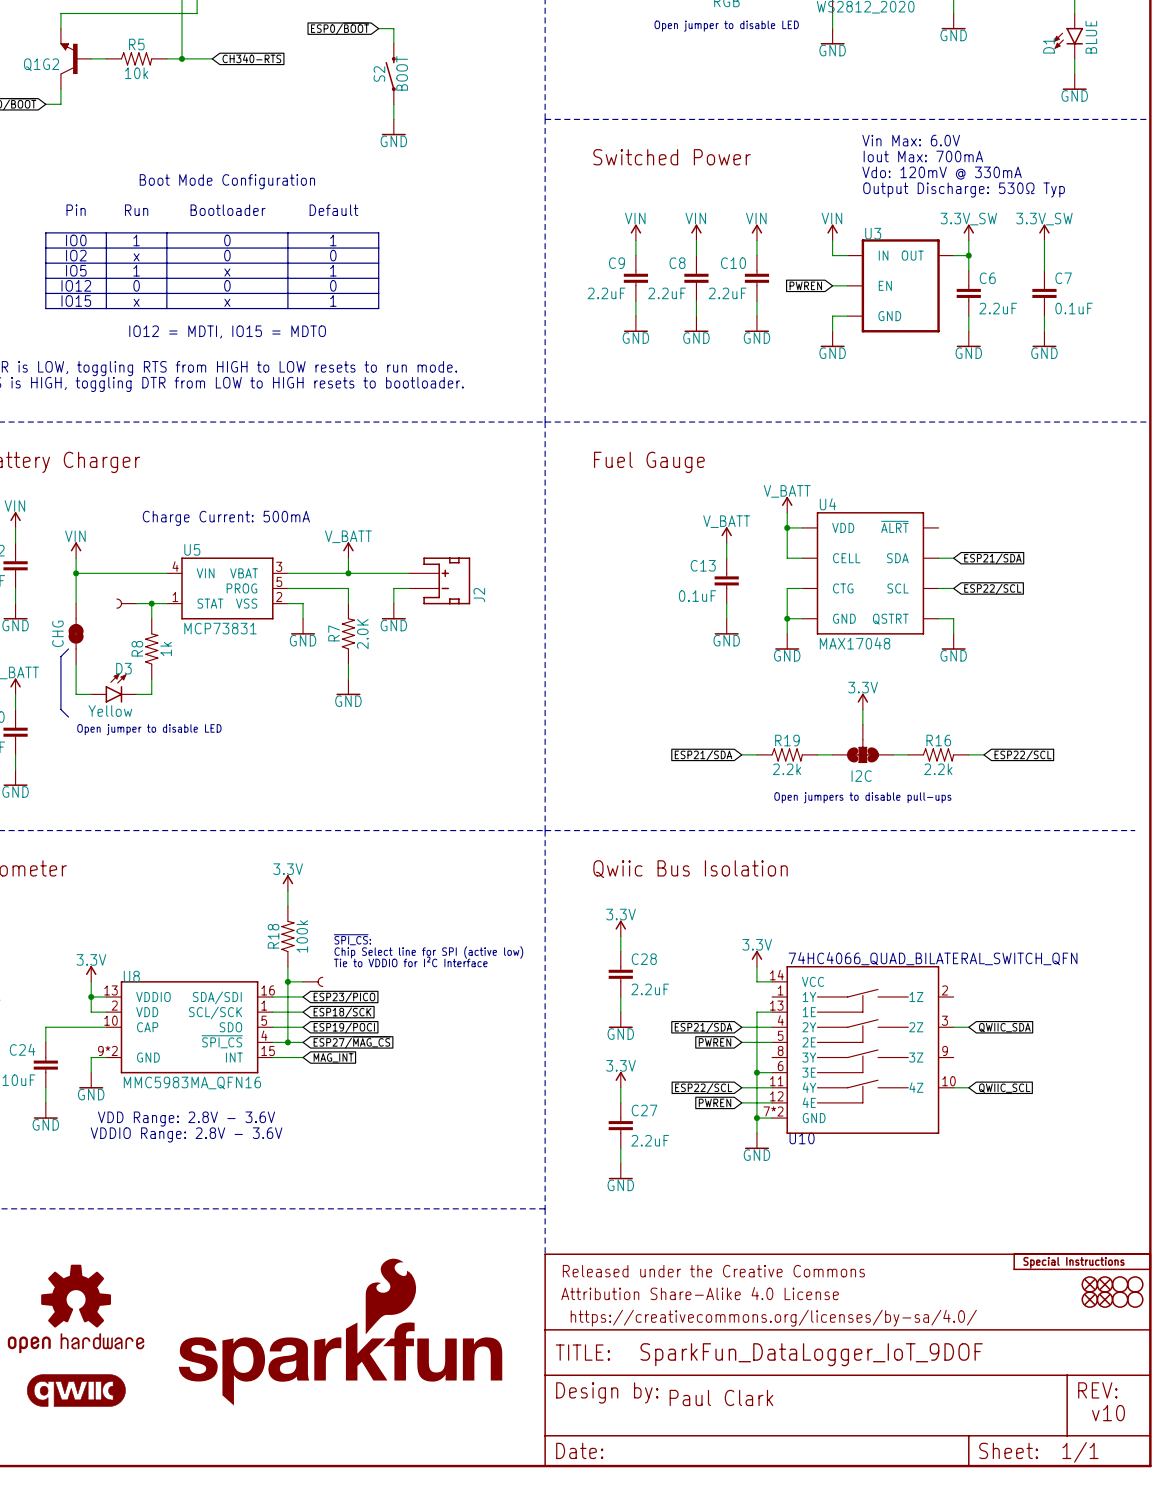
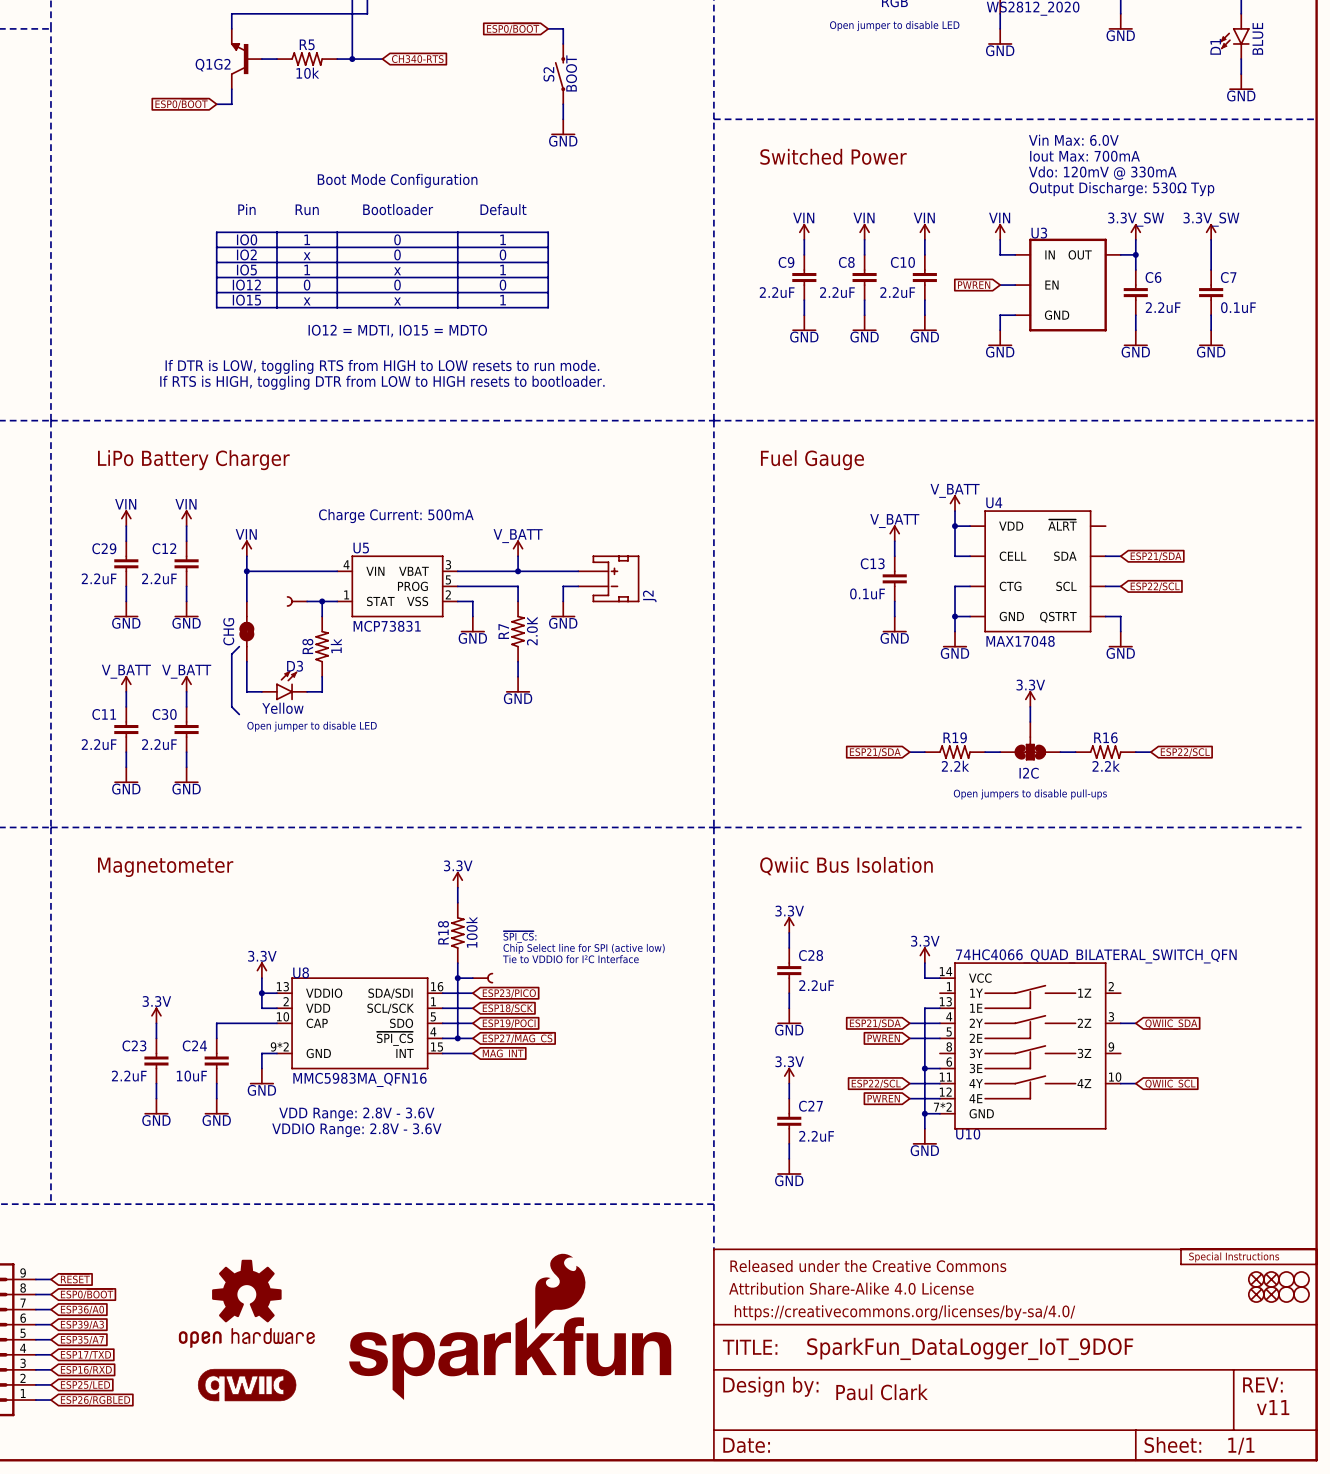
text: v10 (1108, 1413) -> v11 (1273, 1407)

